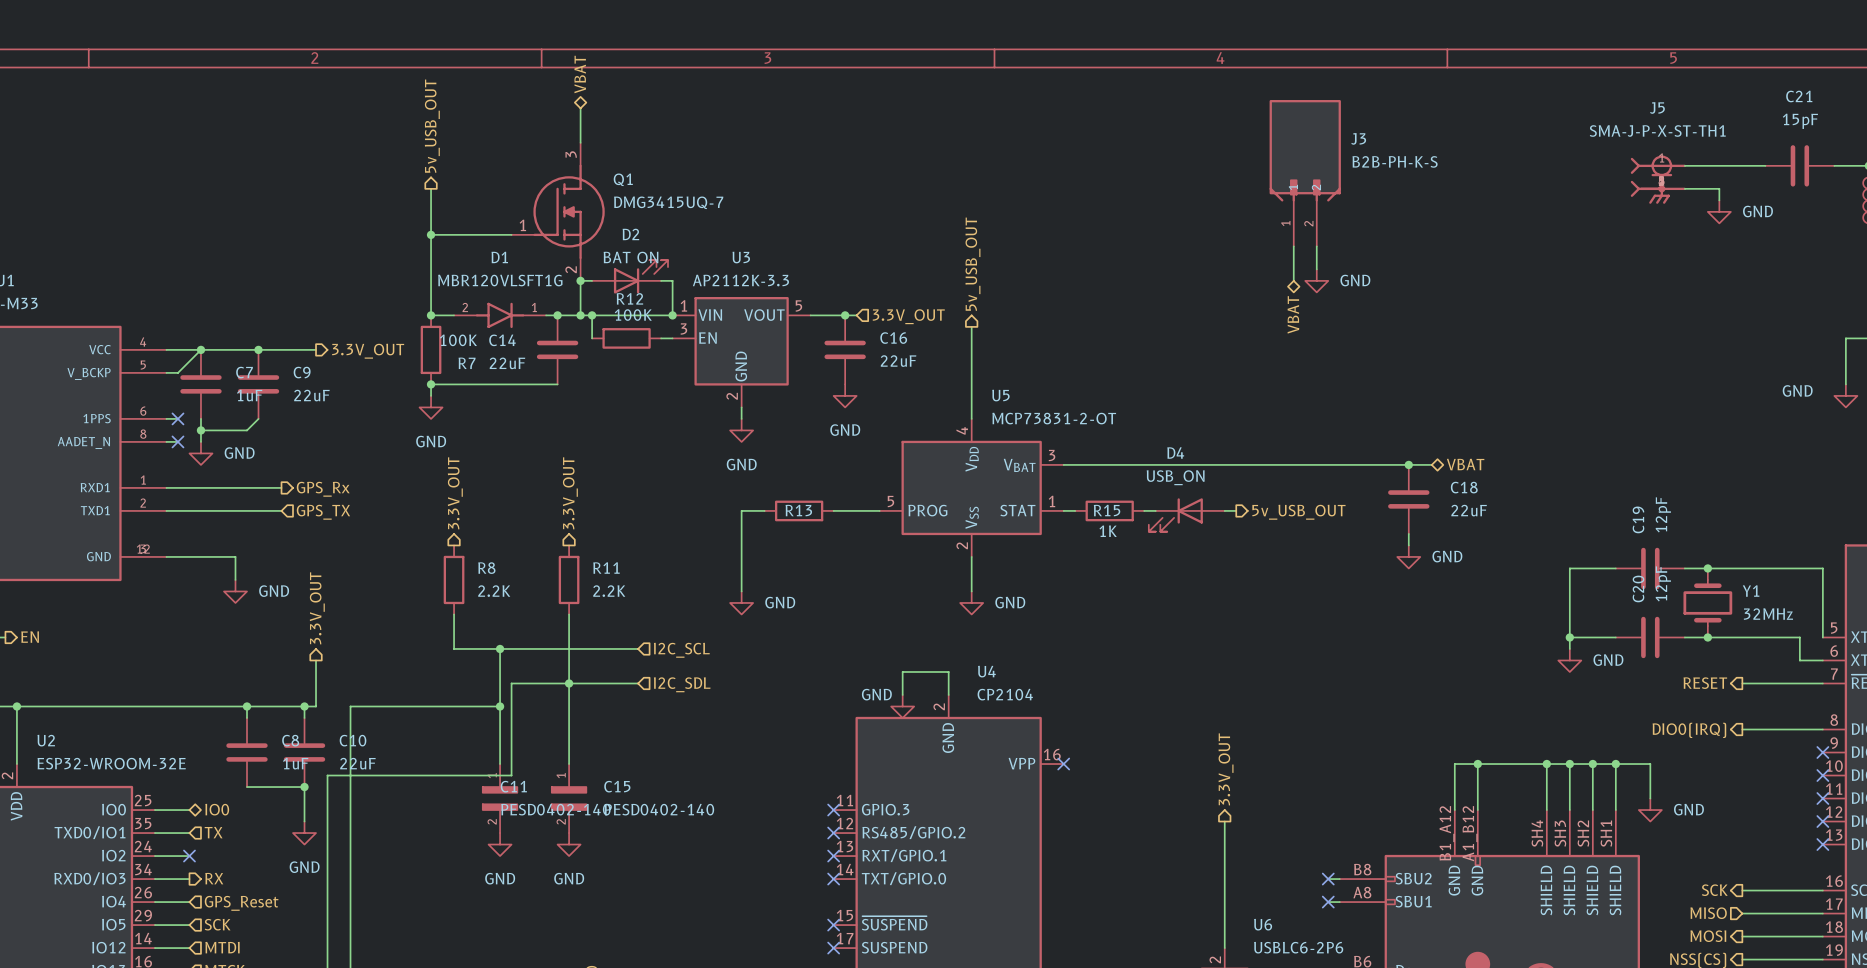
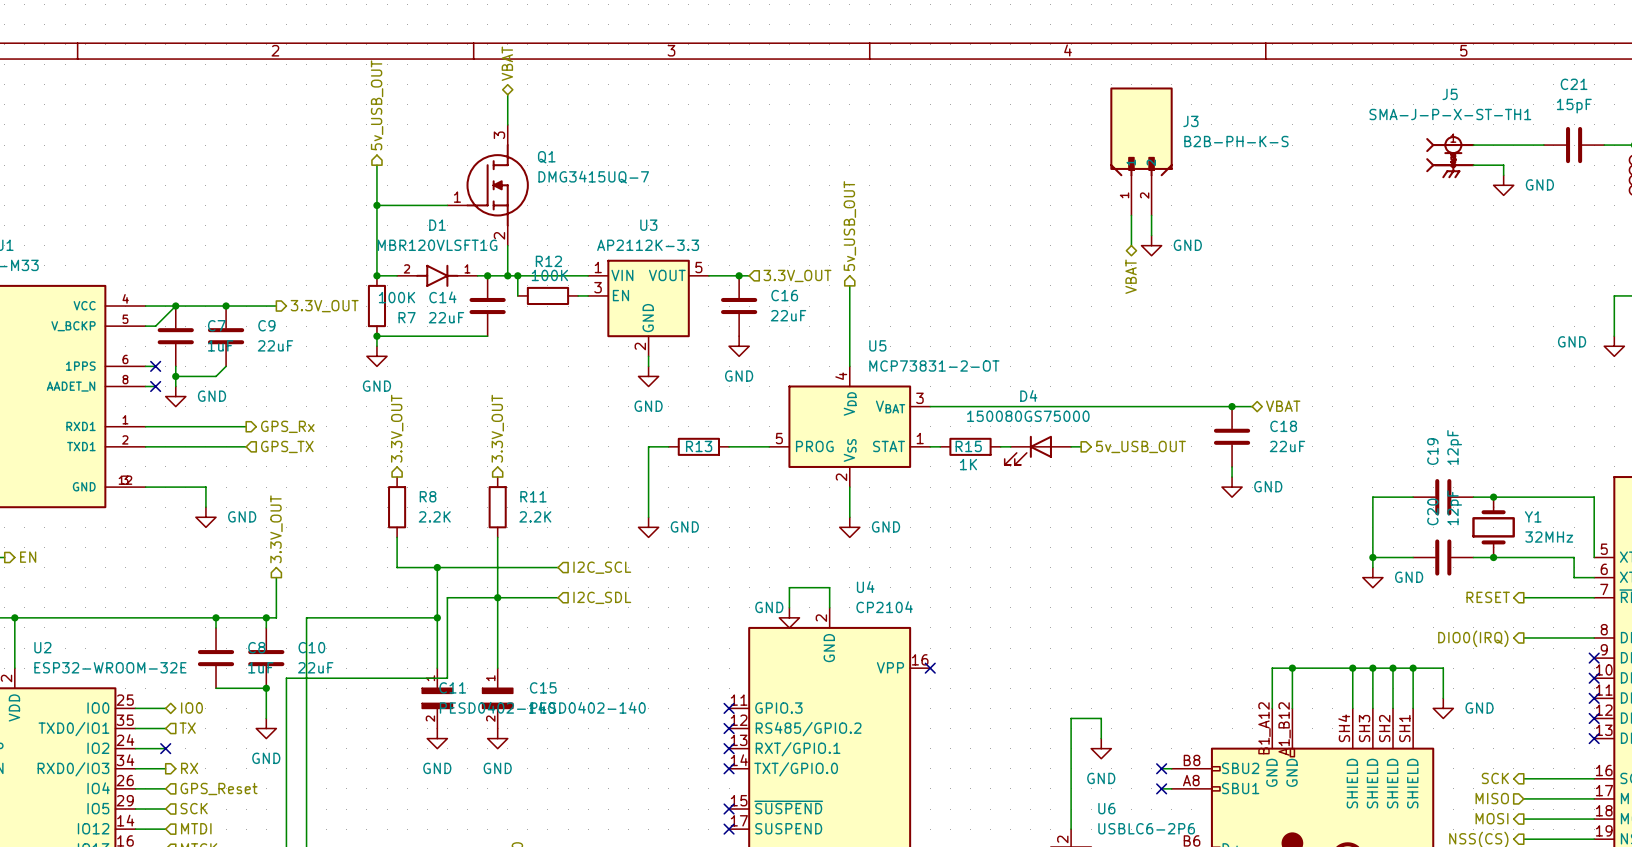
D2: BAT ON (630, 276) -> none
wire: (580, 280) (592, 280) -> none
junction: (580, 280) -> none
wire: (661, 280) (672, 280) (672, 315) -> none
junction: (672, 315) -> none
D4 value: USB_ON (1175, 477) -> 150080GS75000 (1028, 416)
hierarchical label: 3.3V_OUT (1226, 769) -> none
wire: none -> (1071, 718) (1101, 718) (1101, 738)
power symbol: none -> GND (1101, 748)

